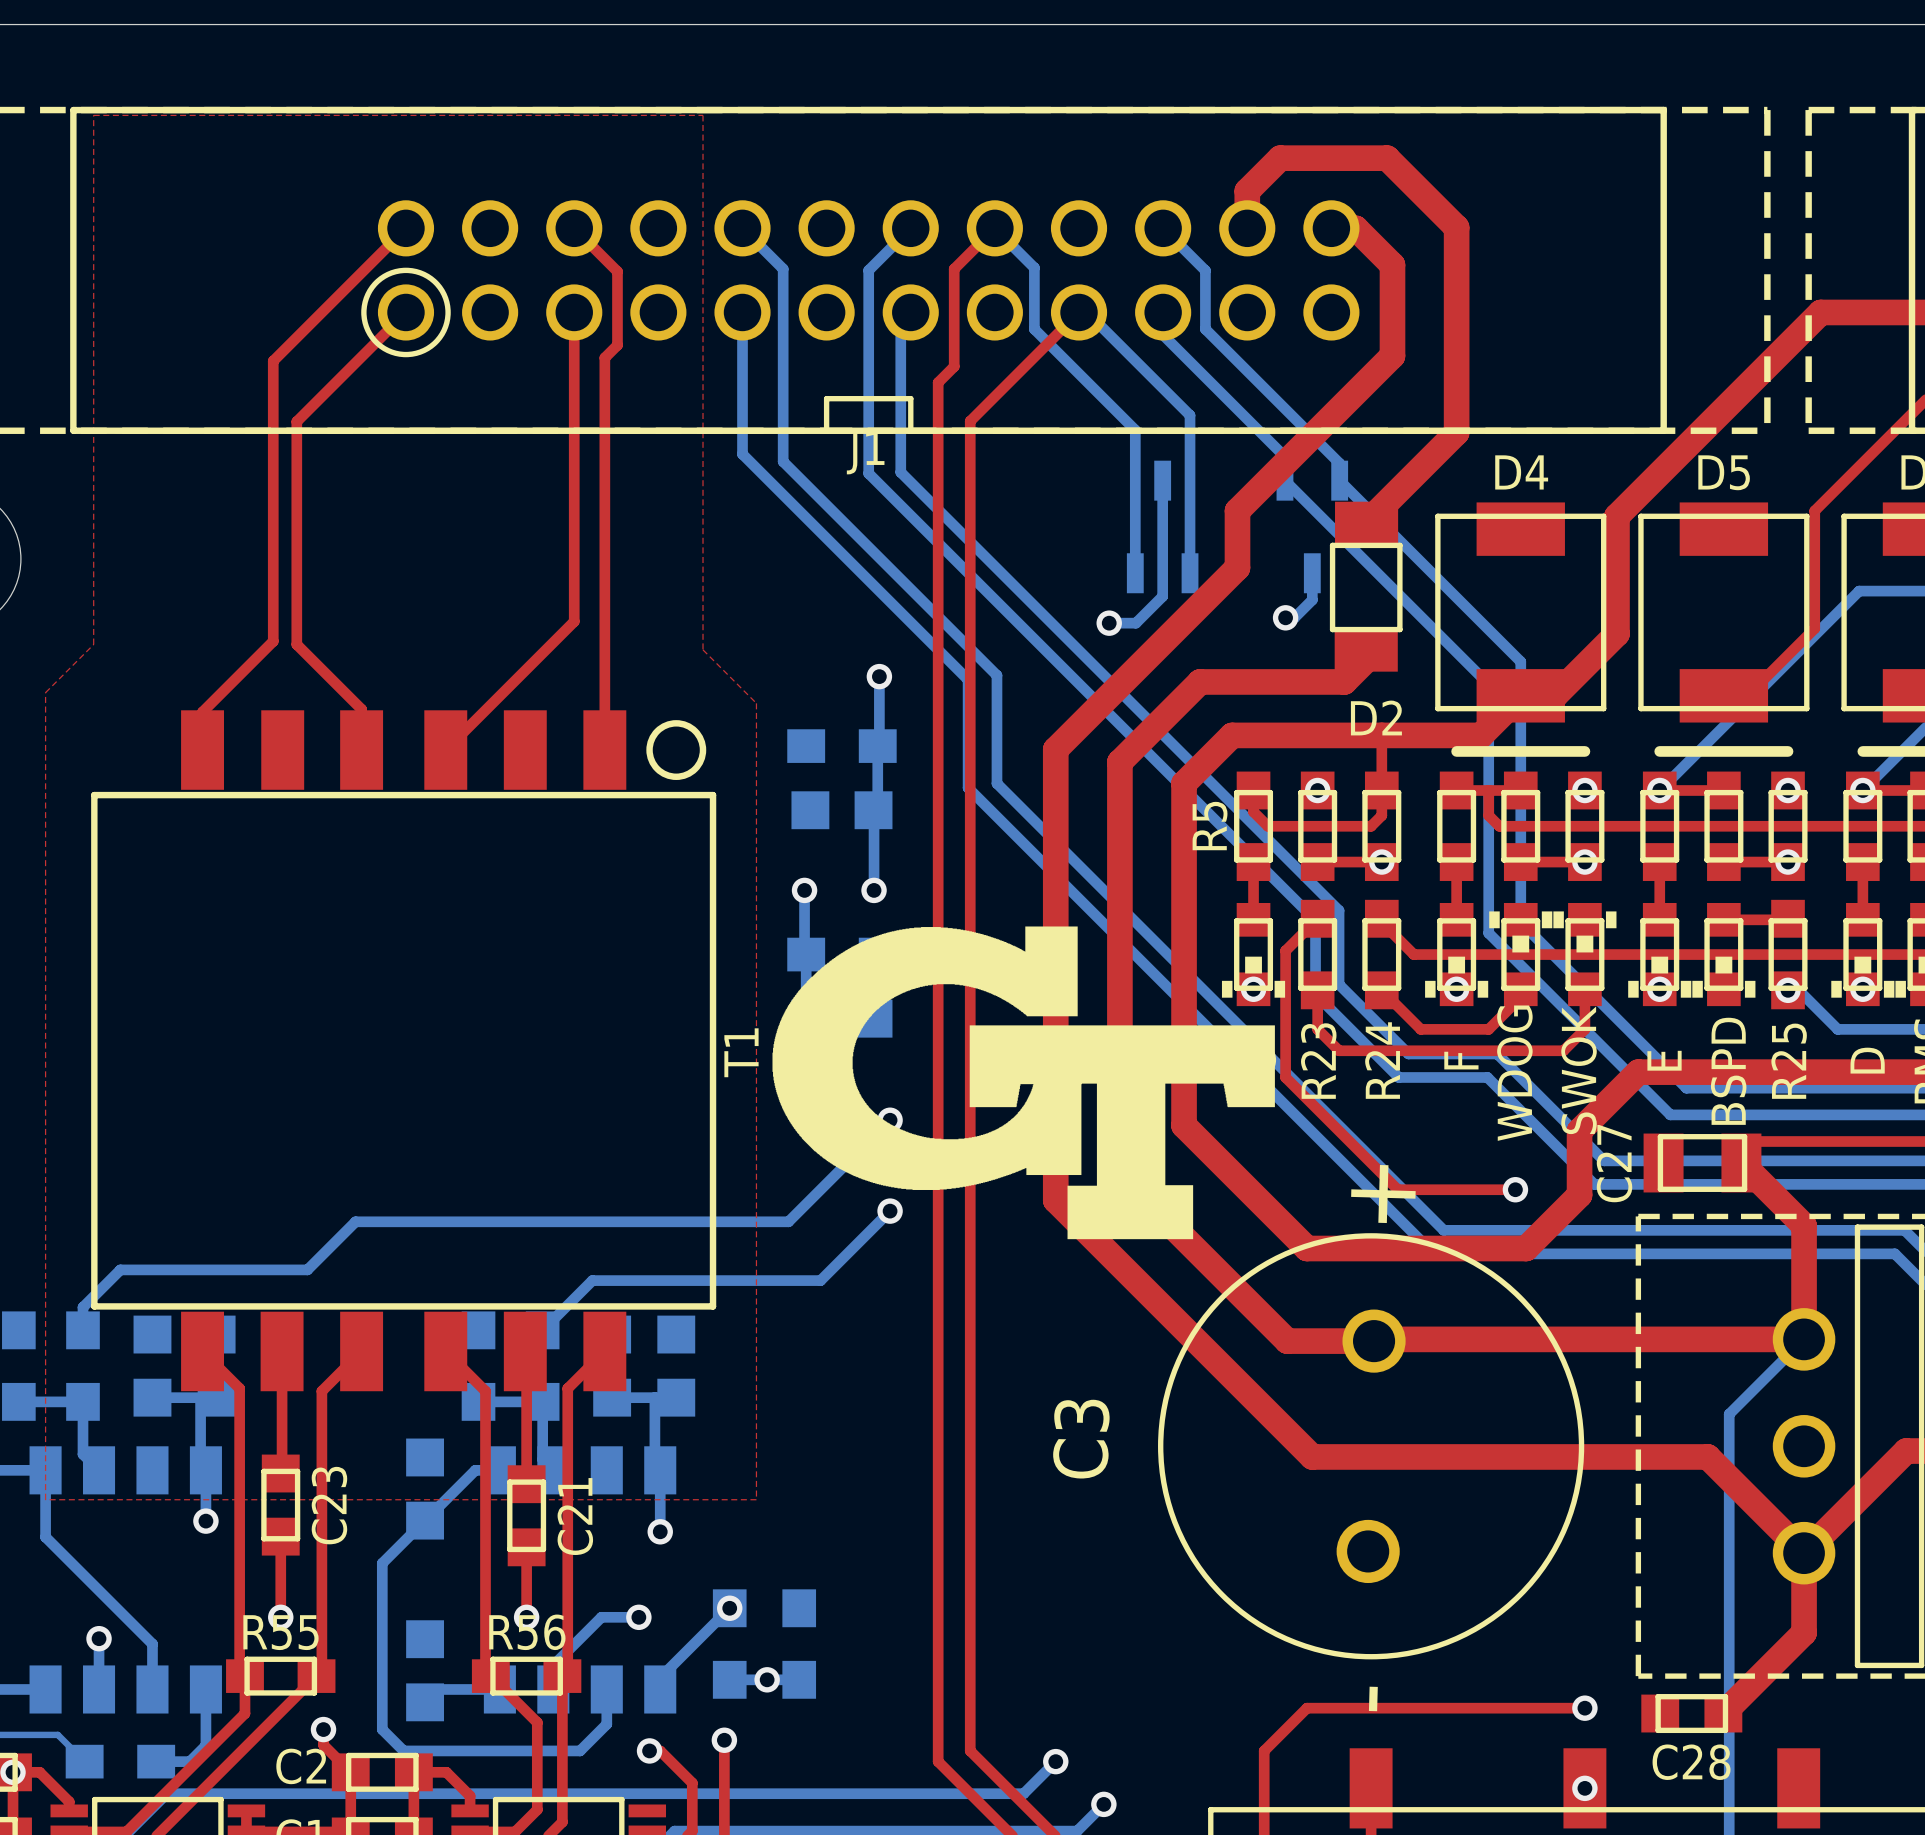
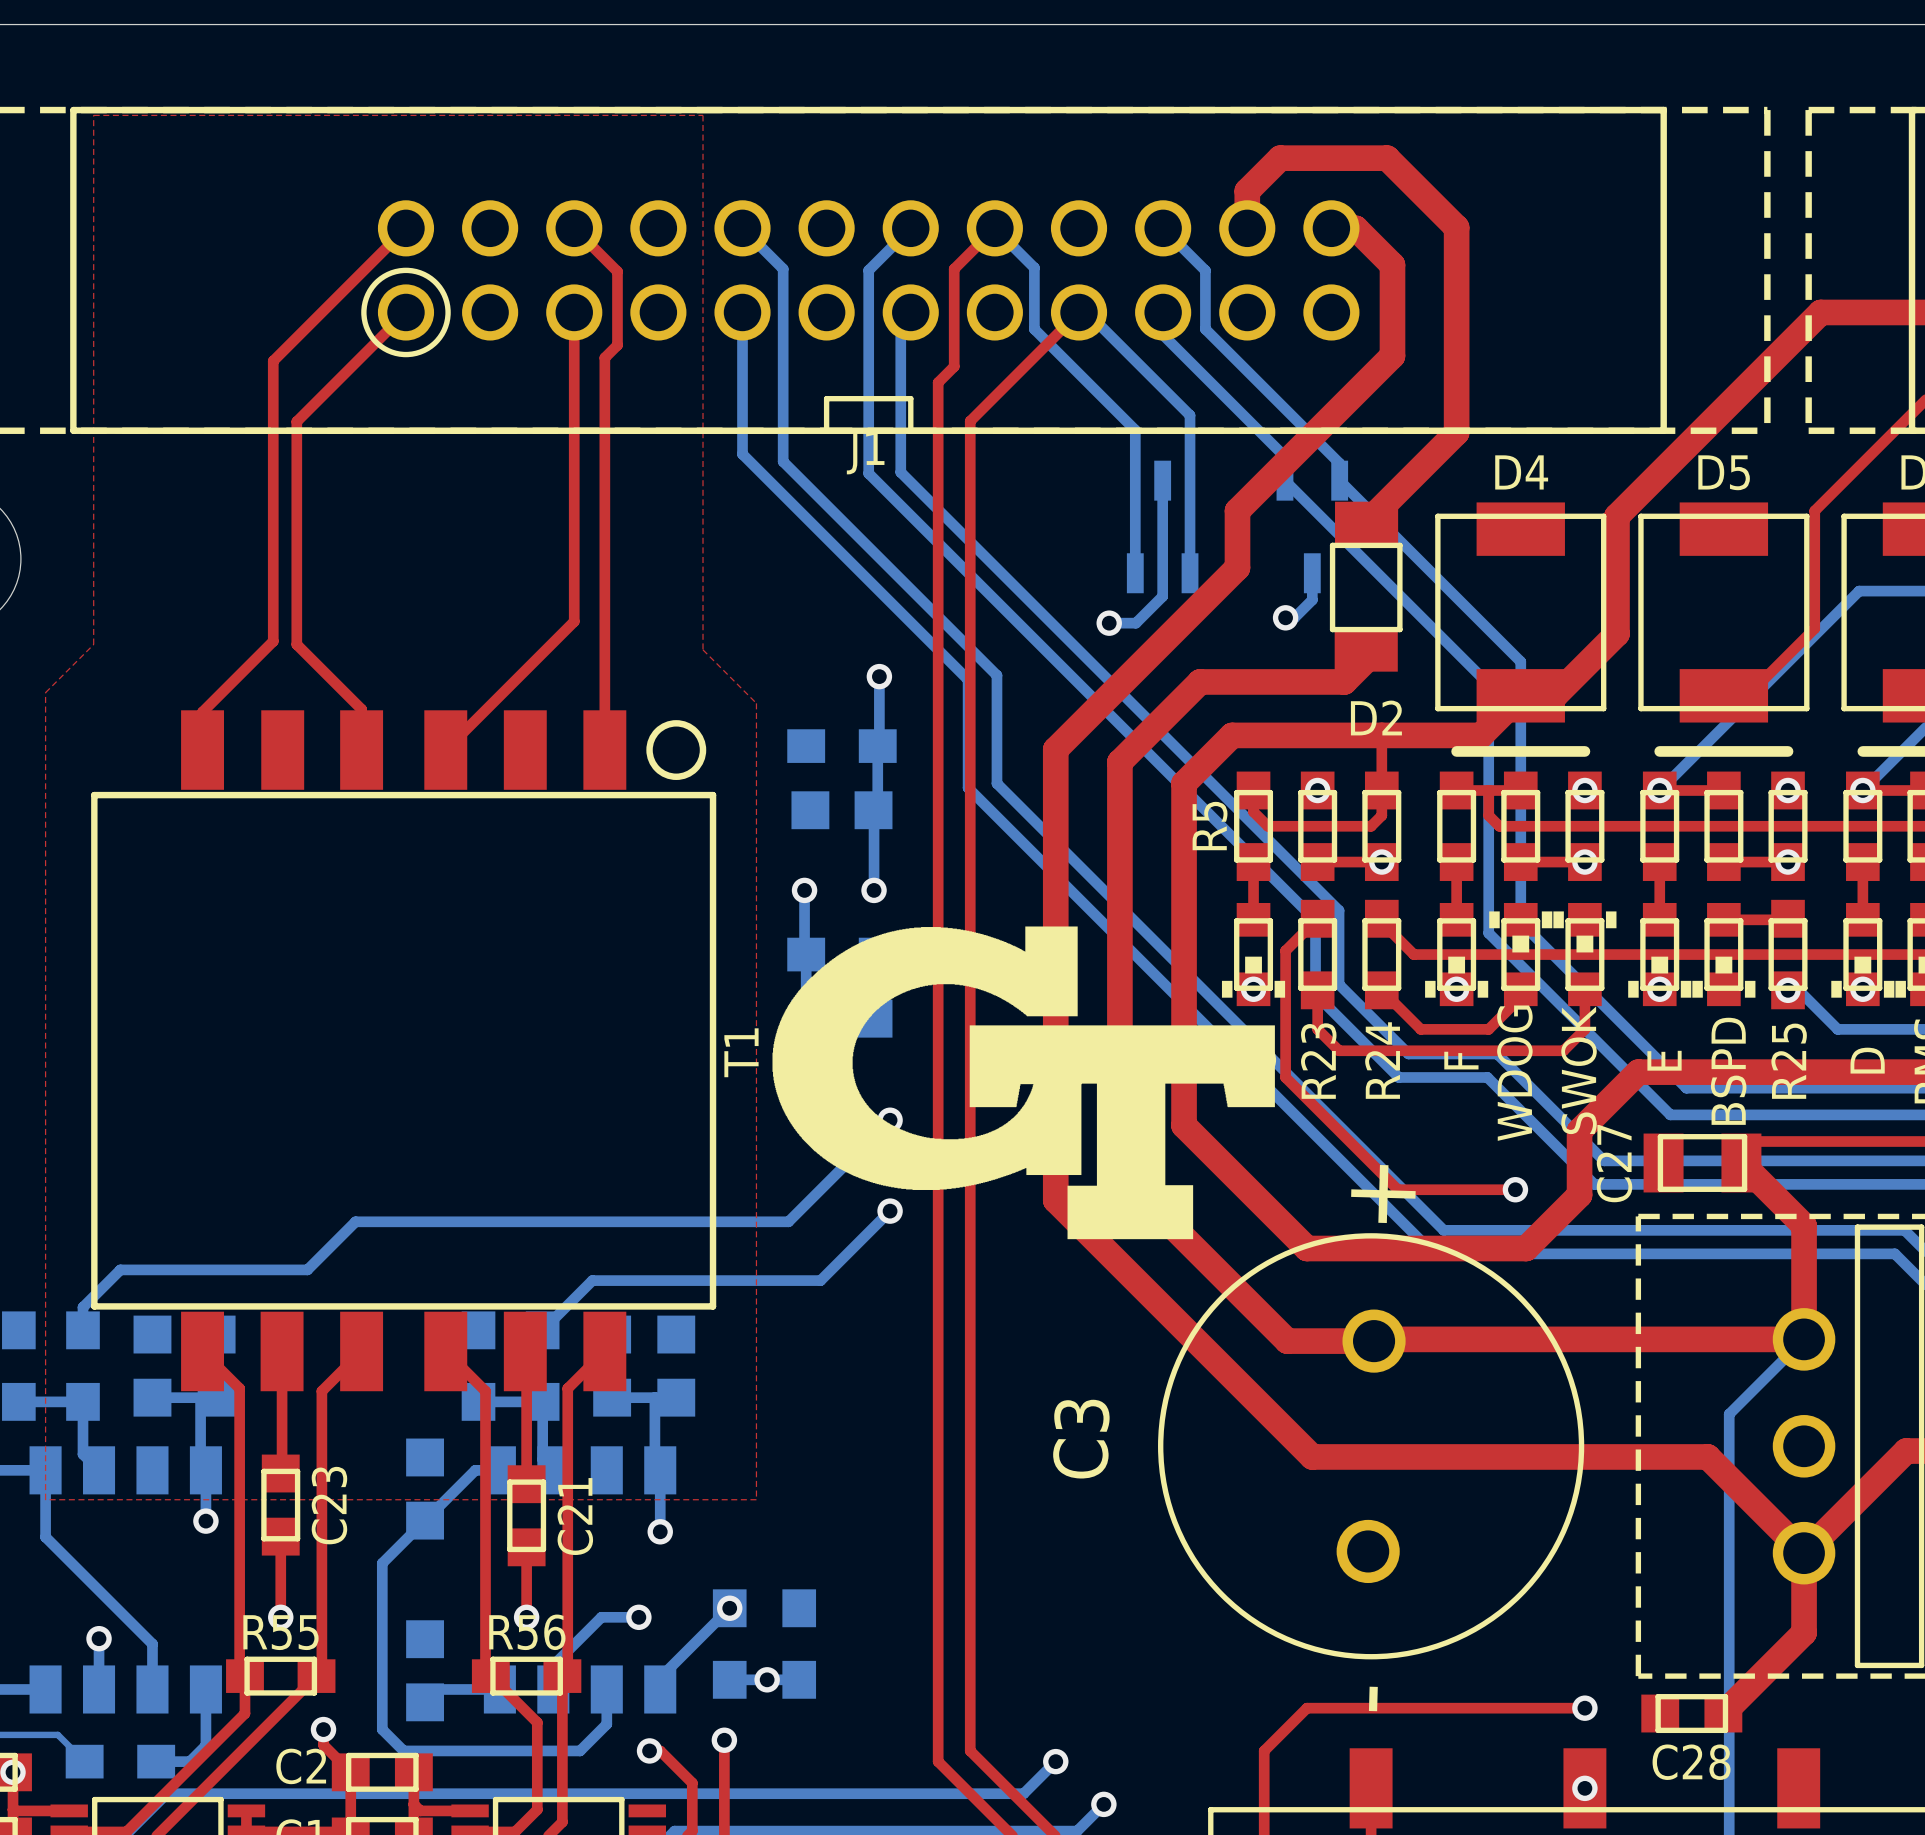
top track: (13, 1772) (39, 1772) (69, 1801) (69, 1810) -> (13, 1809) (69, 1810)
top track: (413, 1772) (446, 1772) (470, 1795) (470, 1810) -> (413, 1804) (420, 1810) (470, 1810)

